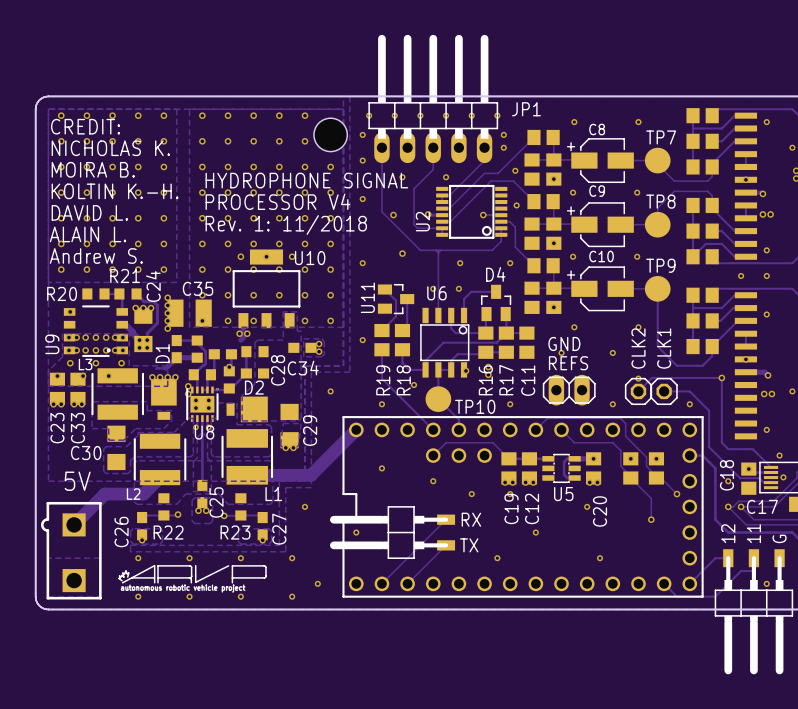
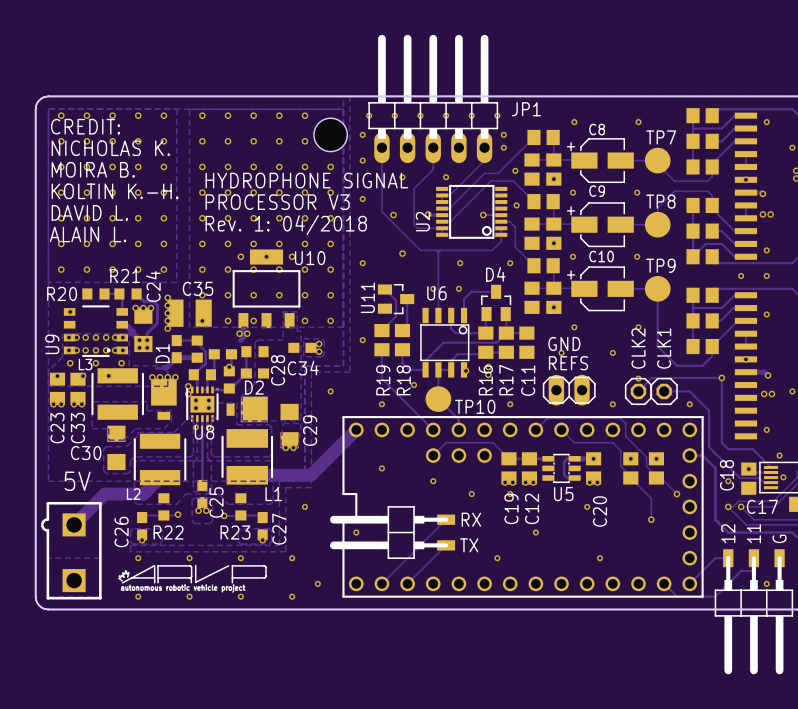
text: PROCESSOR V4 (277, 201) -> PROCESSOR V3 (277, 202)
text: Rev. 1: 11/2018 (286, 225) -> Rev. 1: 04/2018 (286, 225)
text: Andrew S. (96, 255) -> none

